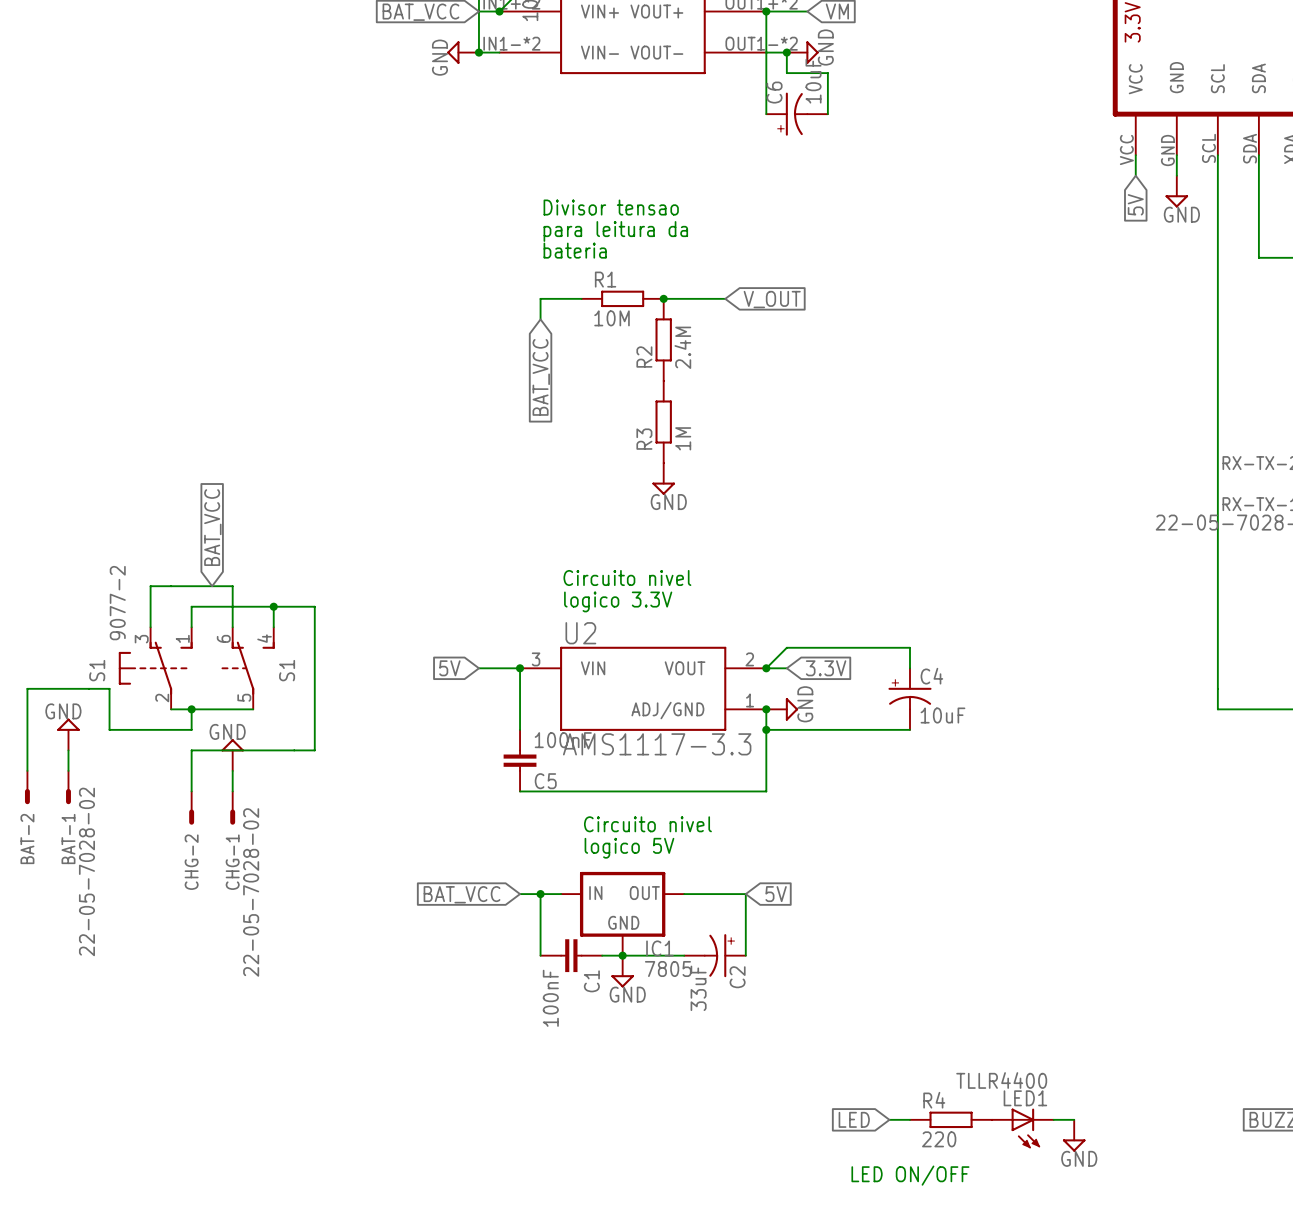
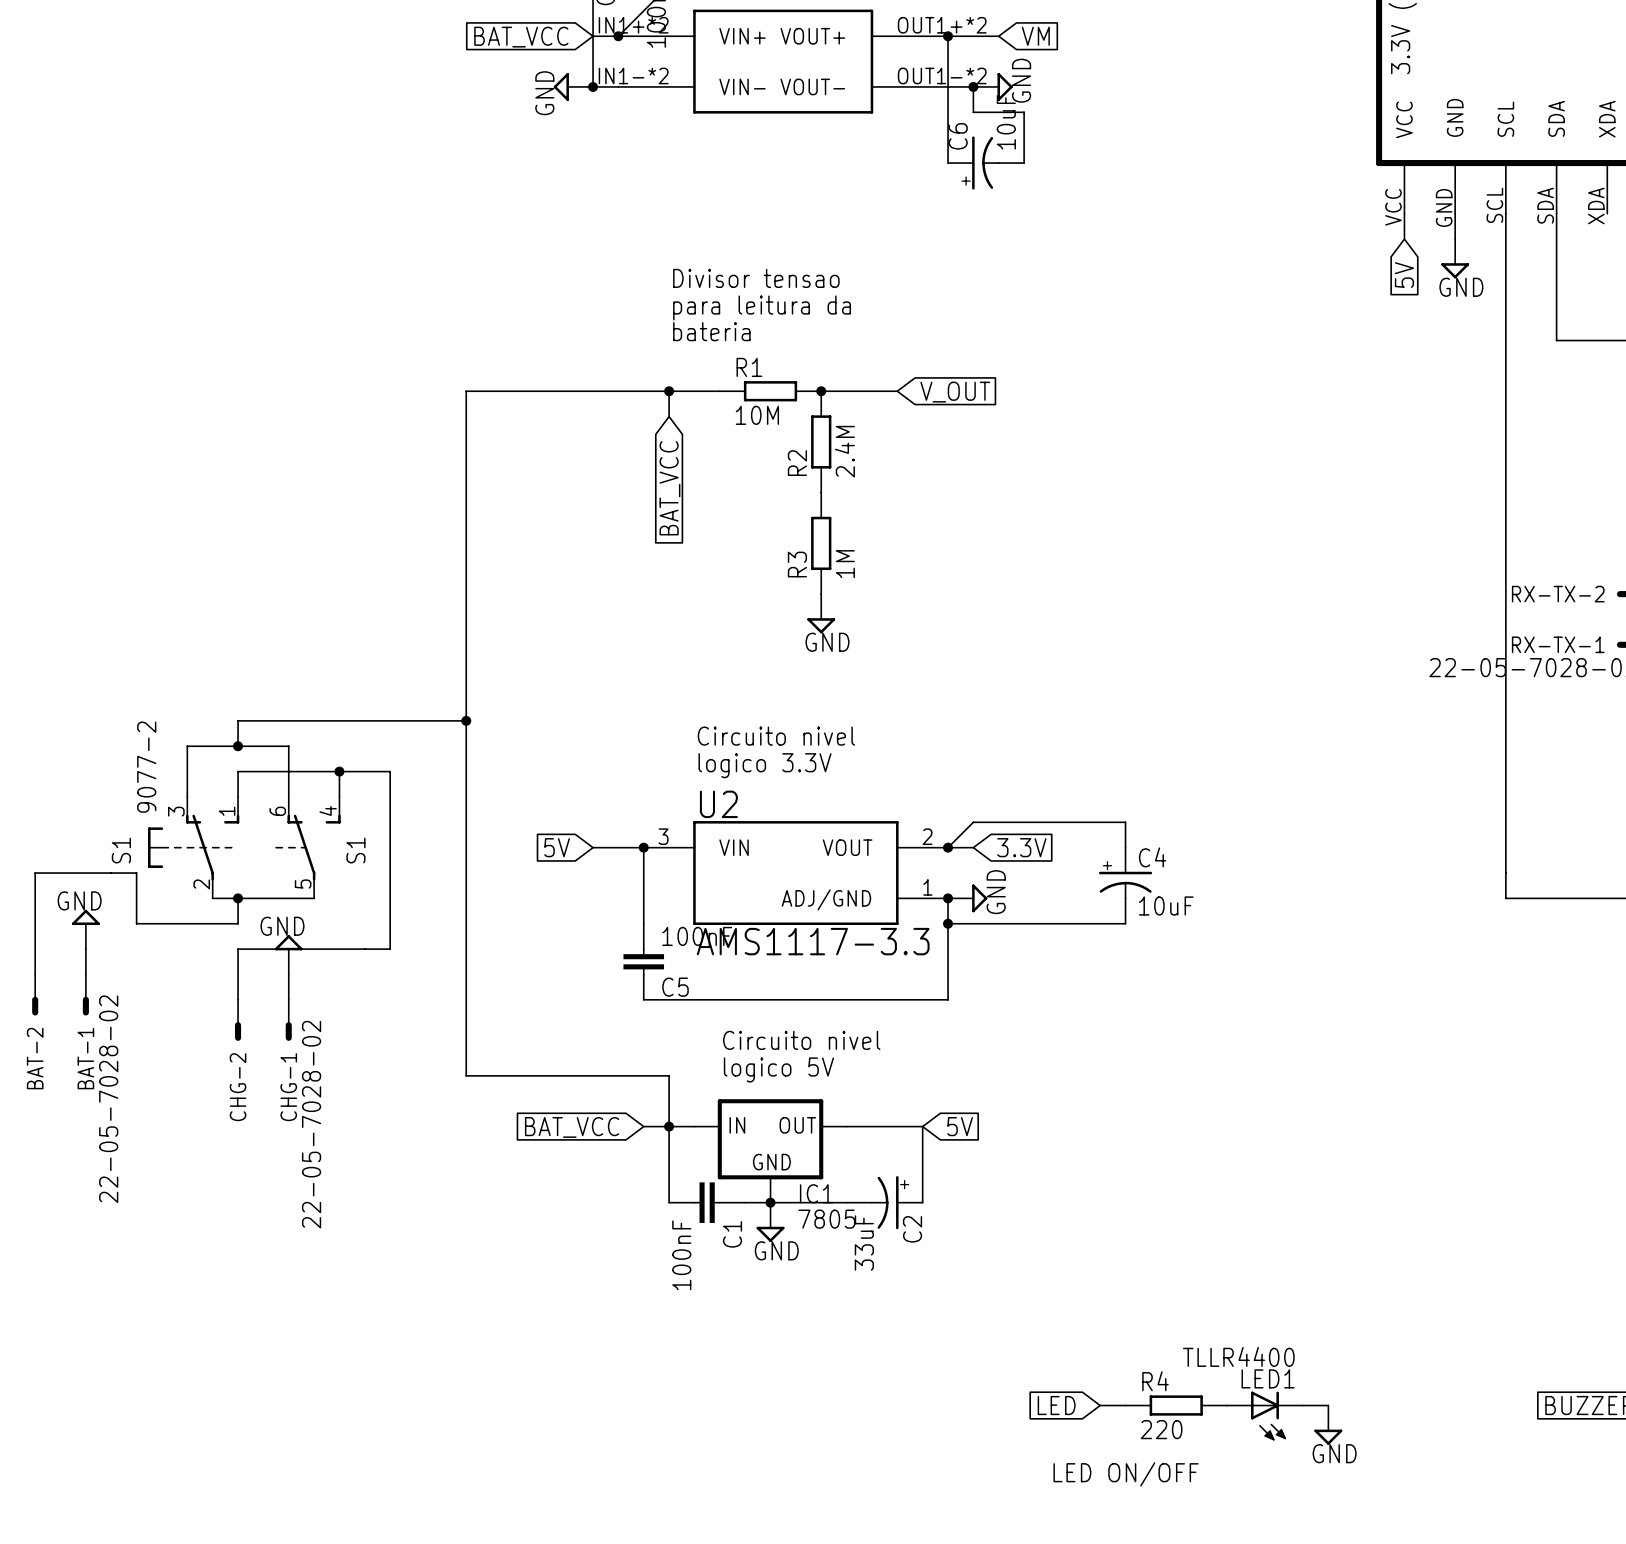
wire: none -> (669, 391) (466, 391) (466, 1075) (669, 1075) (669, 1126)
junction: none -> (669, 391)
global label: BAT_VCC (212, 527) -> none
wire: none -> (466, 720) (238, 720) (238, 746)
junction: none -> (466, 720)
junction: none -> (238, 746)

